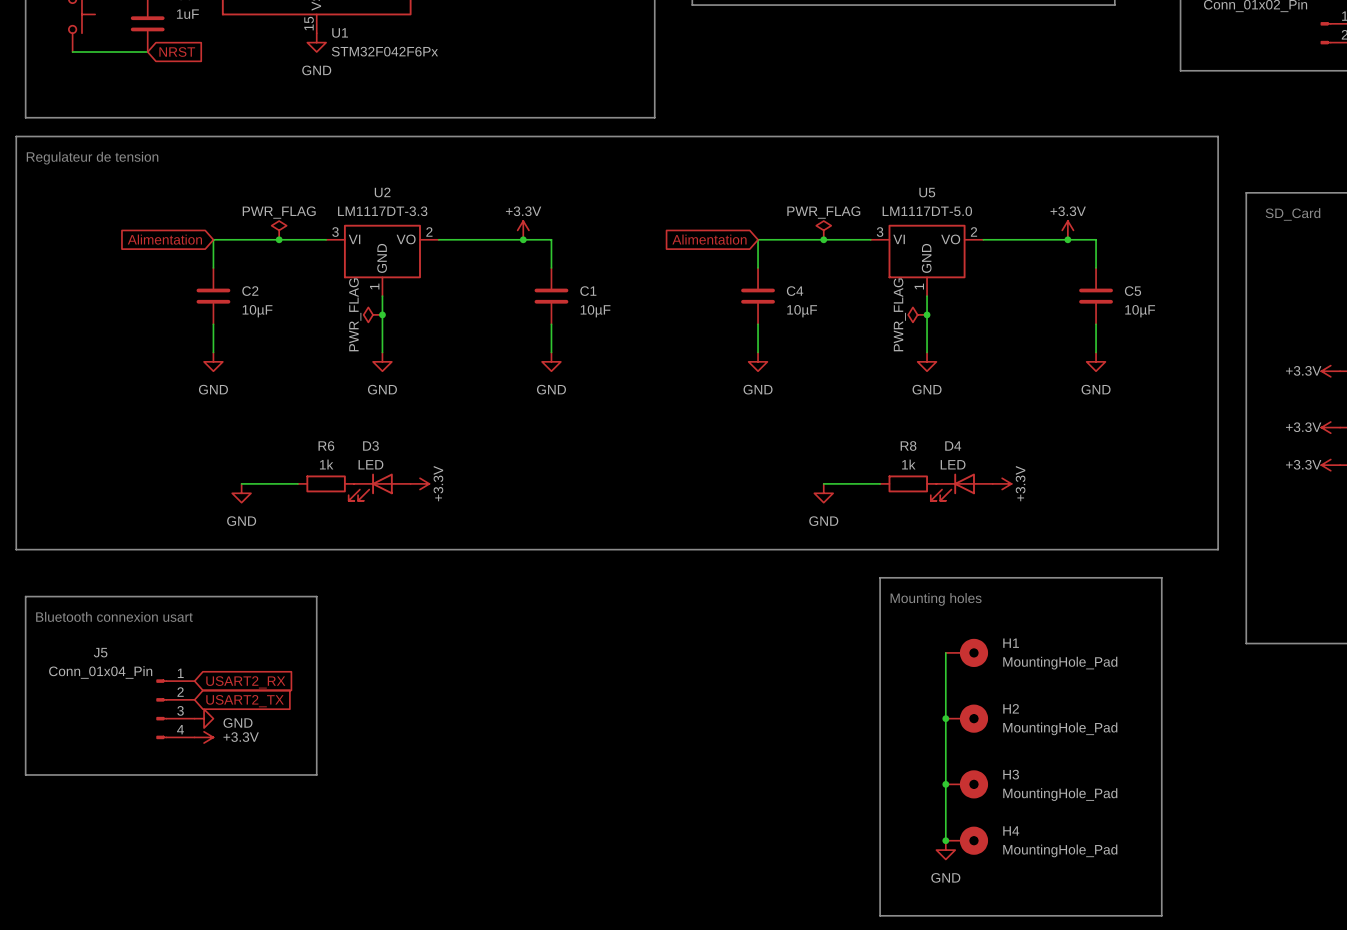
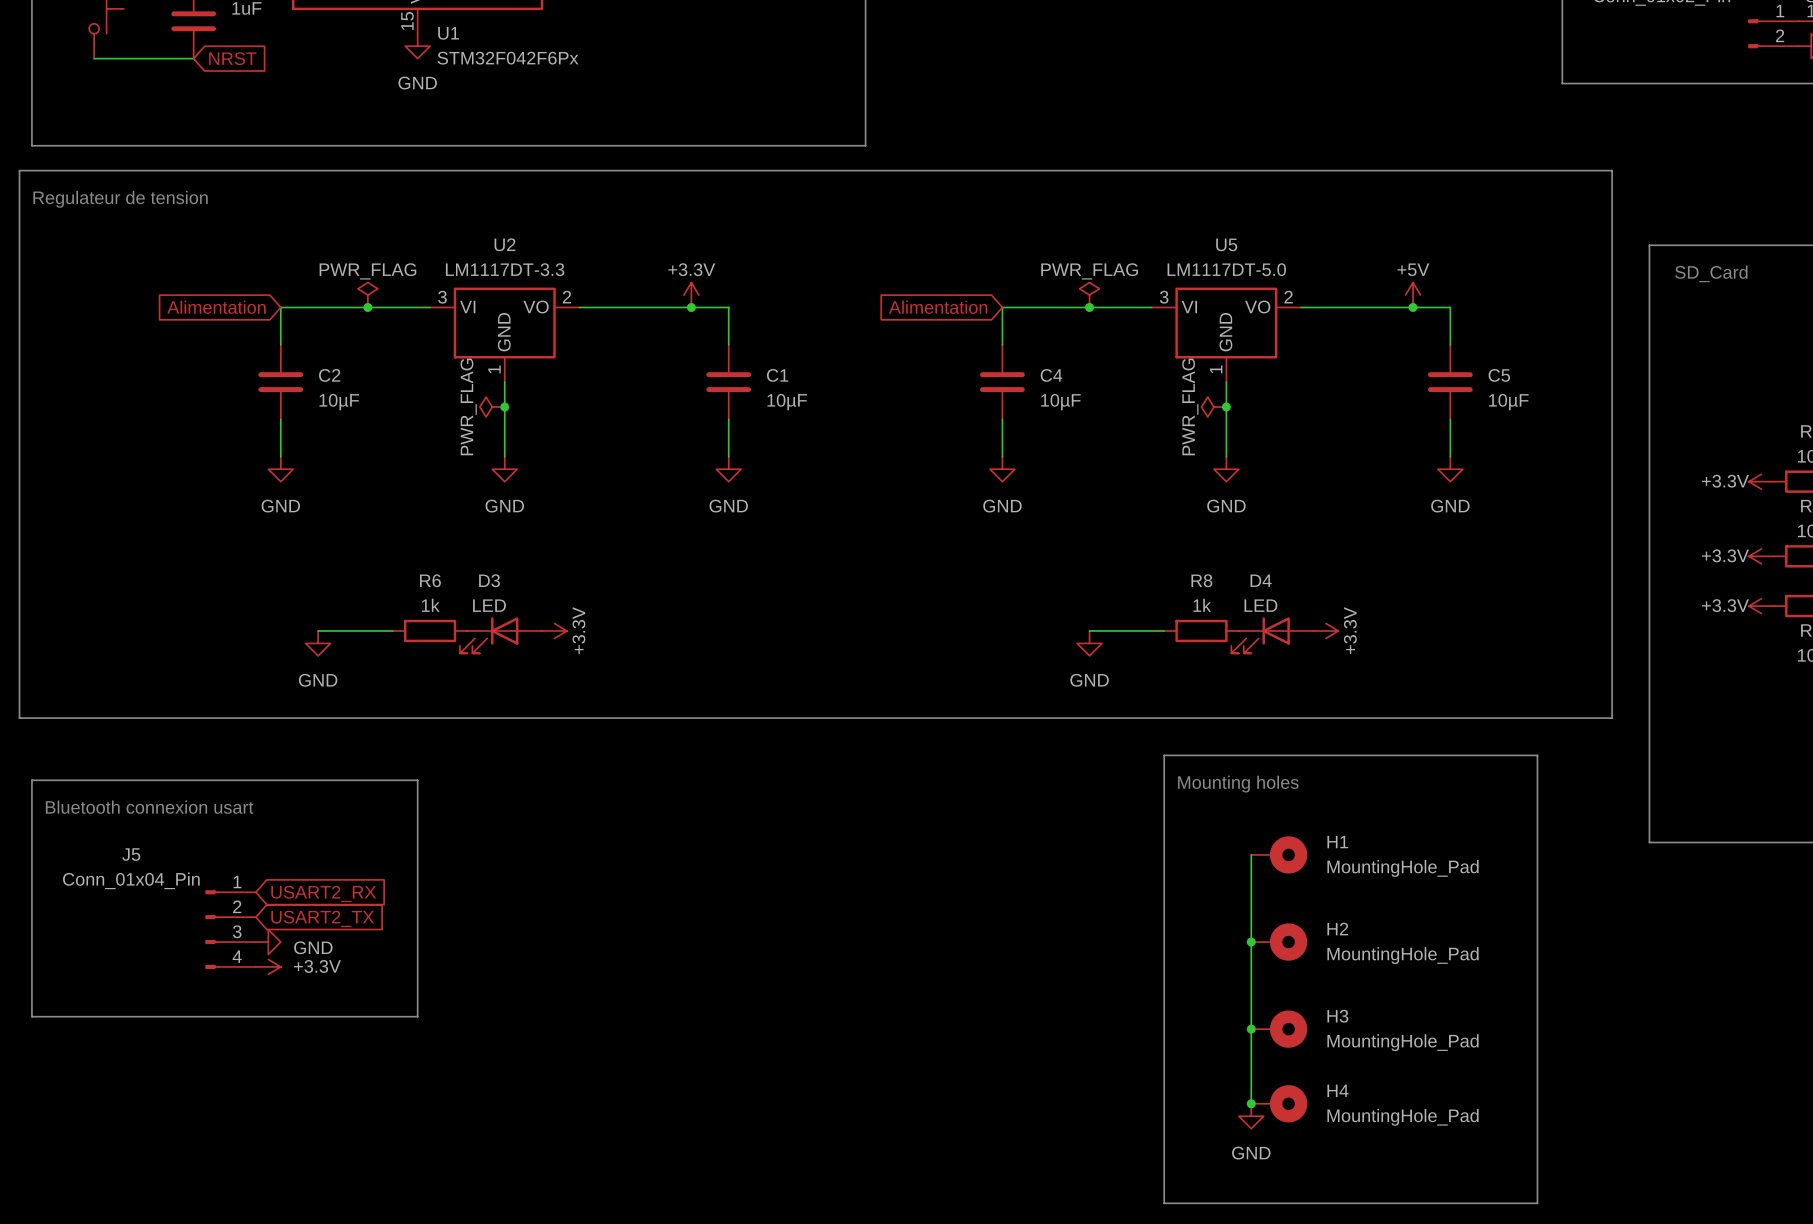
power symbol: +3.3V (1067, 230) -> +5V (1413, 295)

